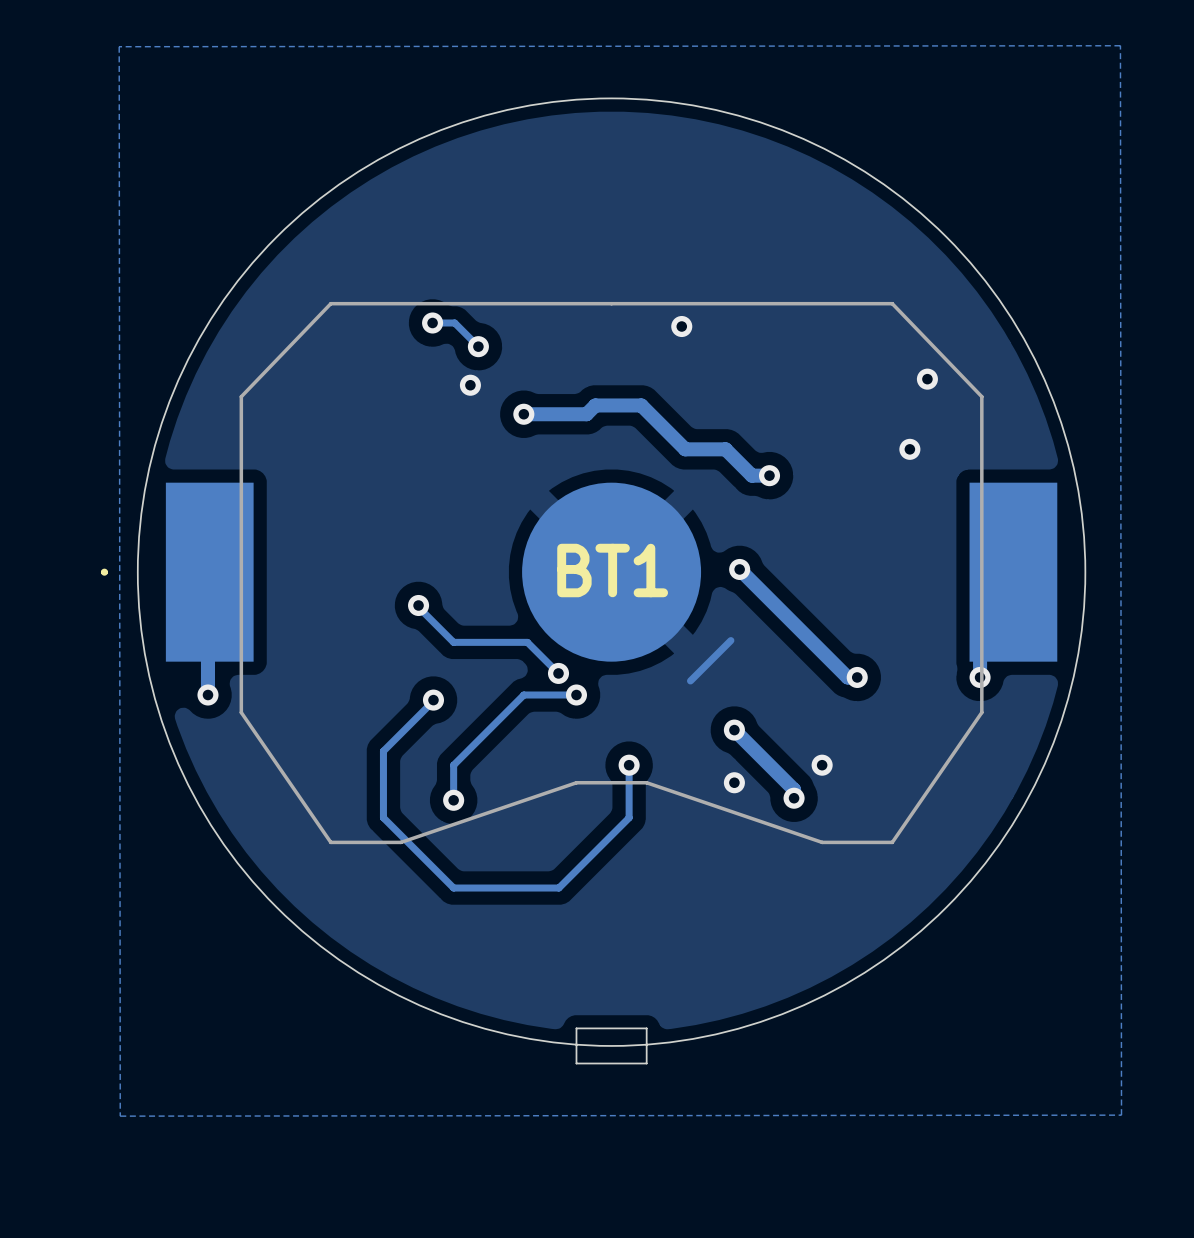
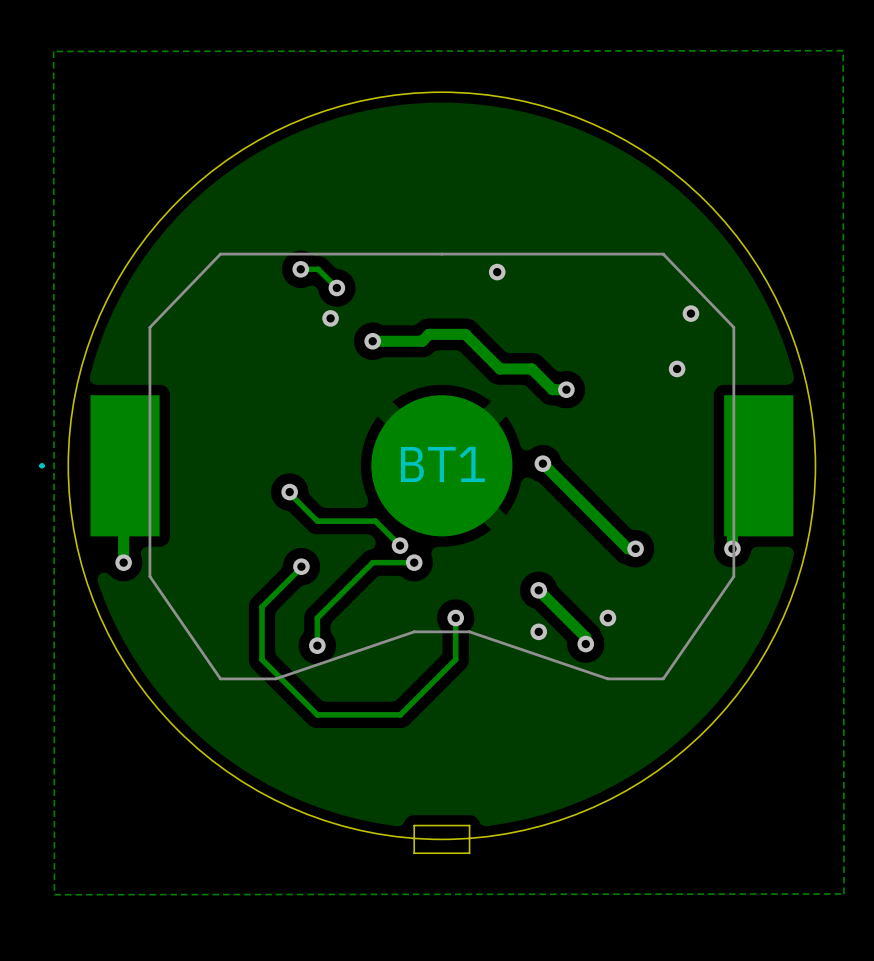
track: (730, 640) (690, 680) -> none

